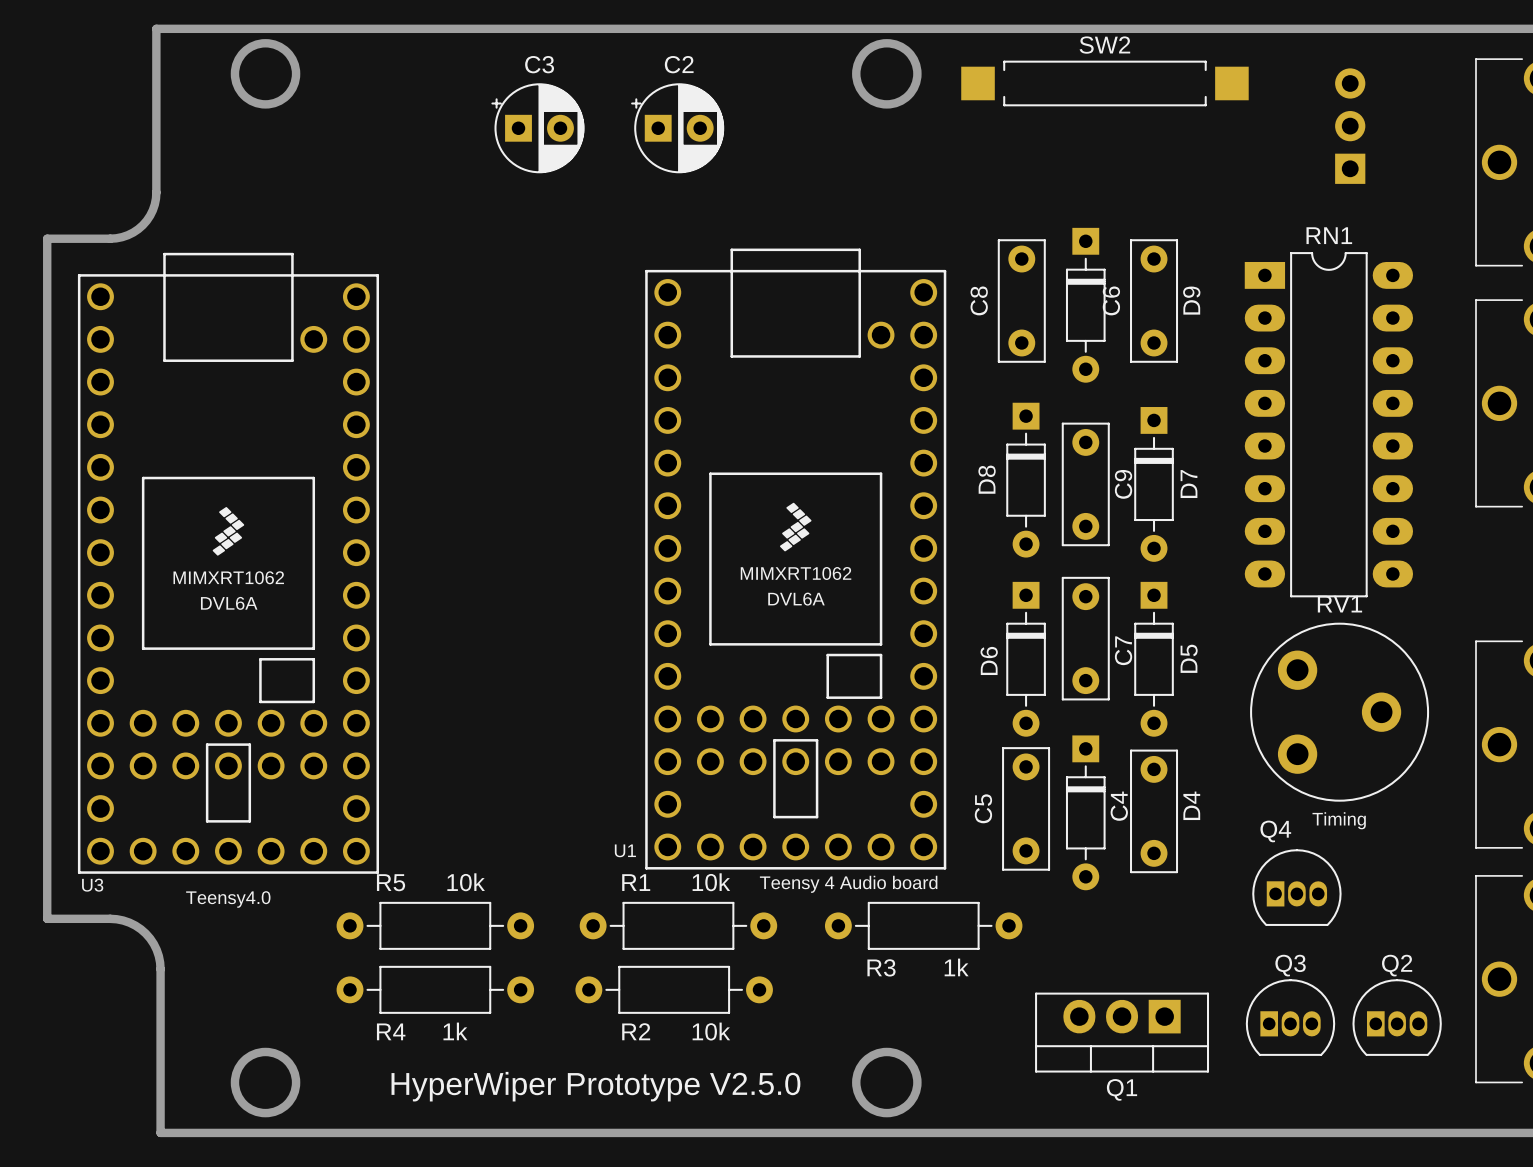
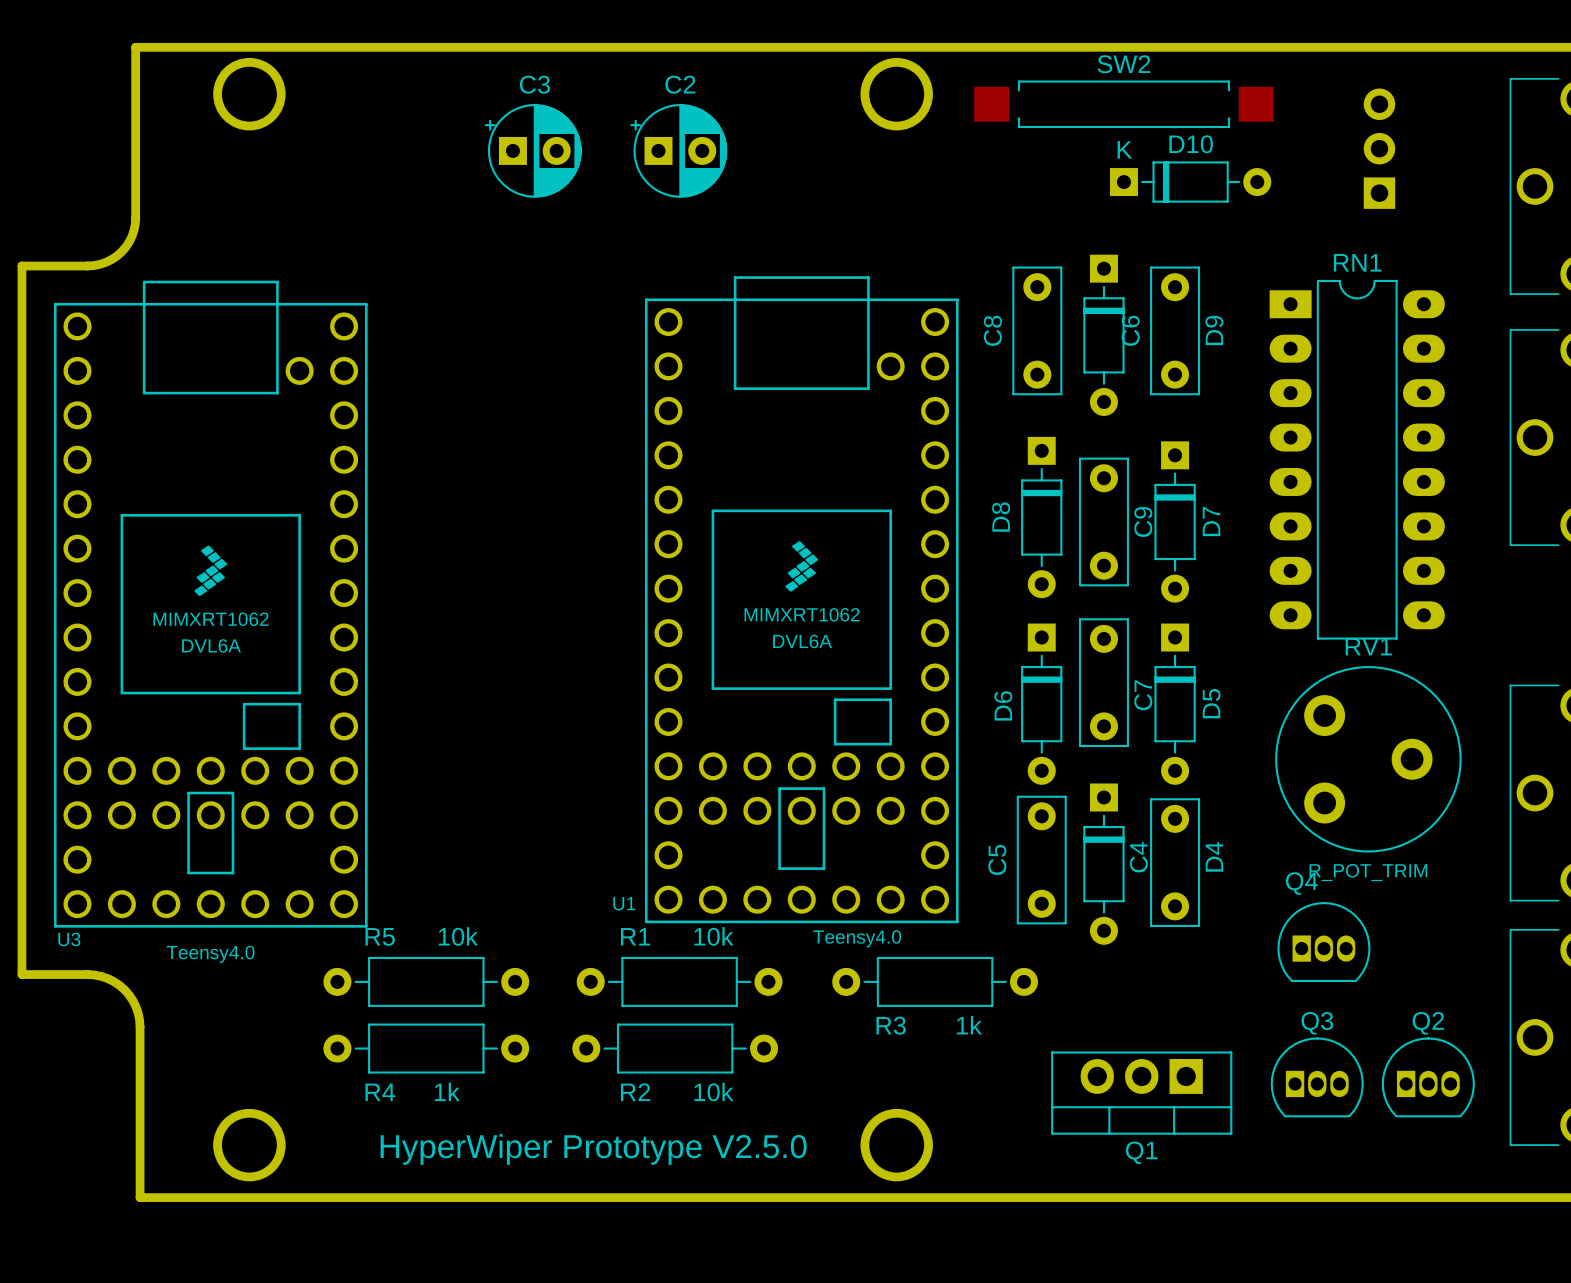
D10: none -> (1190, 182)
RV1 value: Timing (1339, 820) -> R_POT_TRIM (1368, 872)
U1 value: Teensy 4 Audio board (848, 884) -> Teensy4.0 (857, 938)

